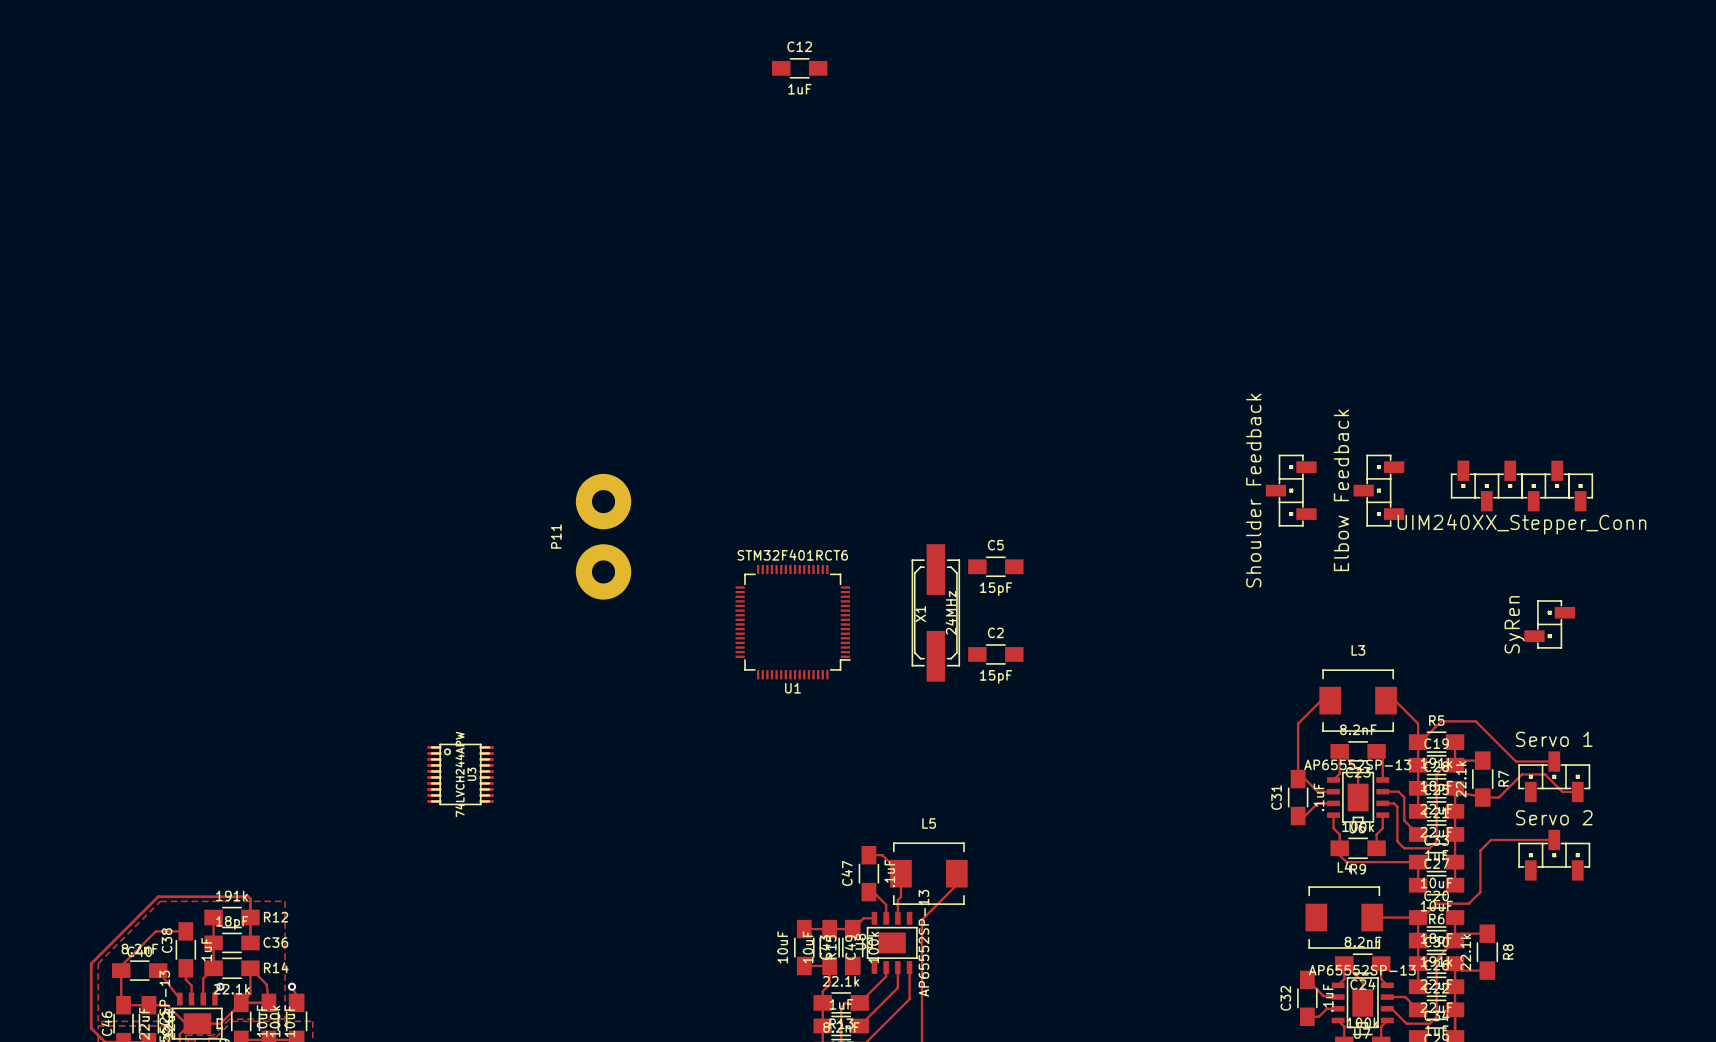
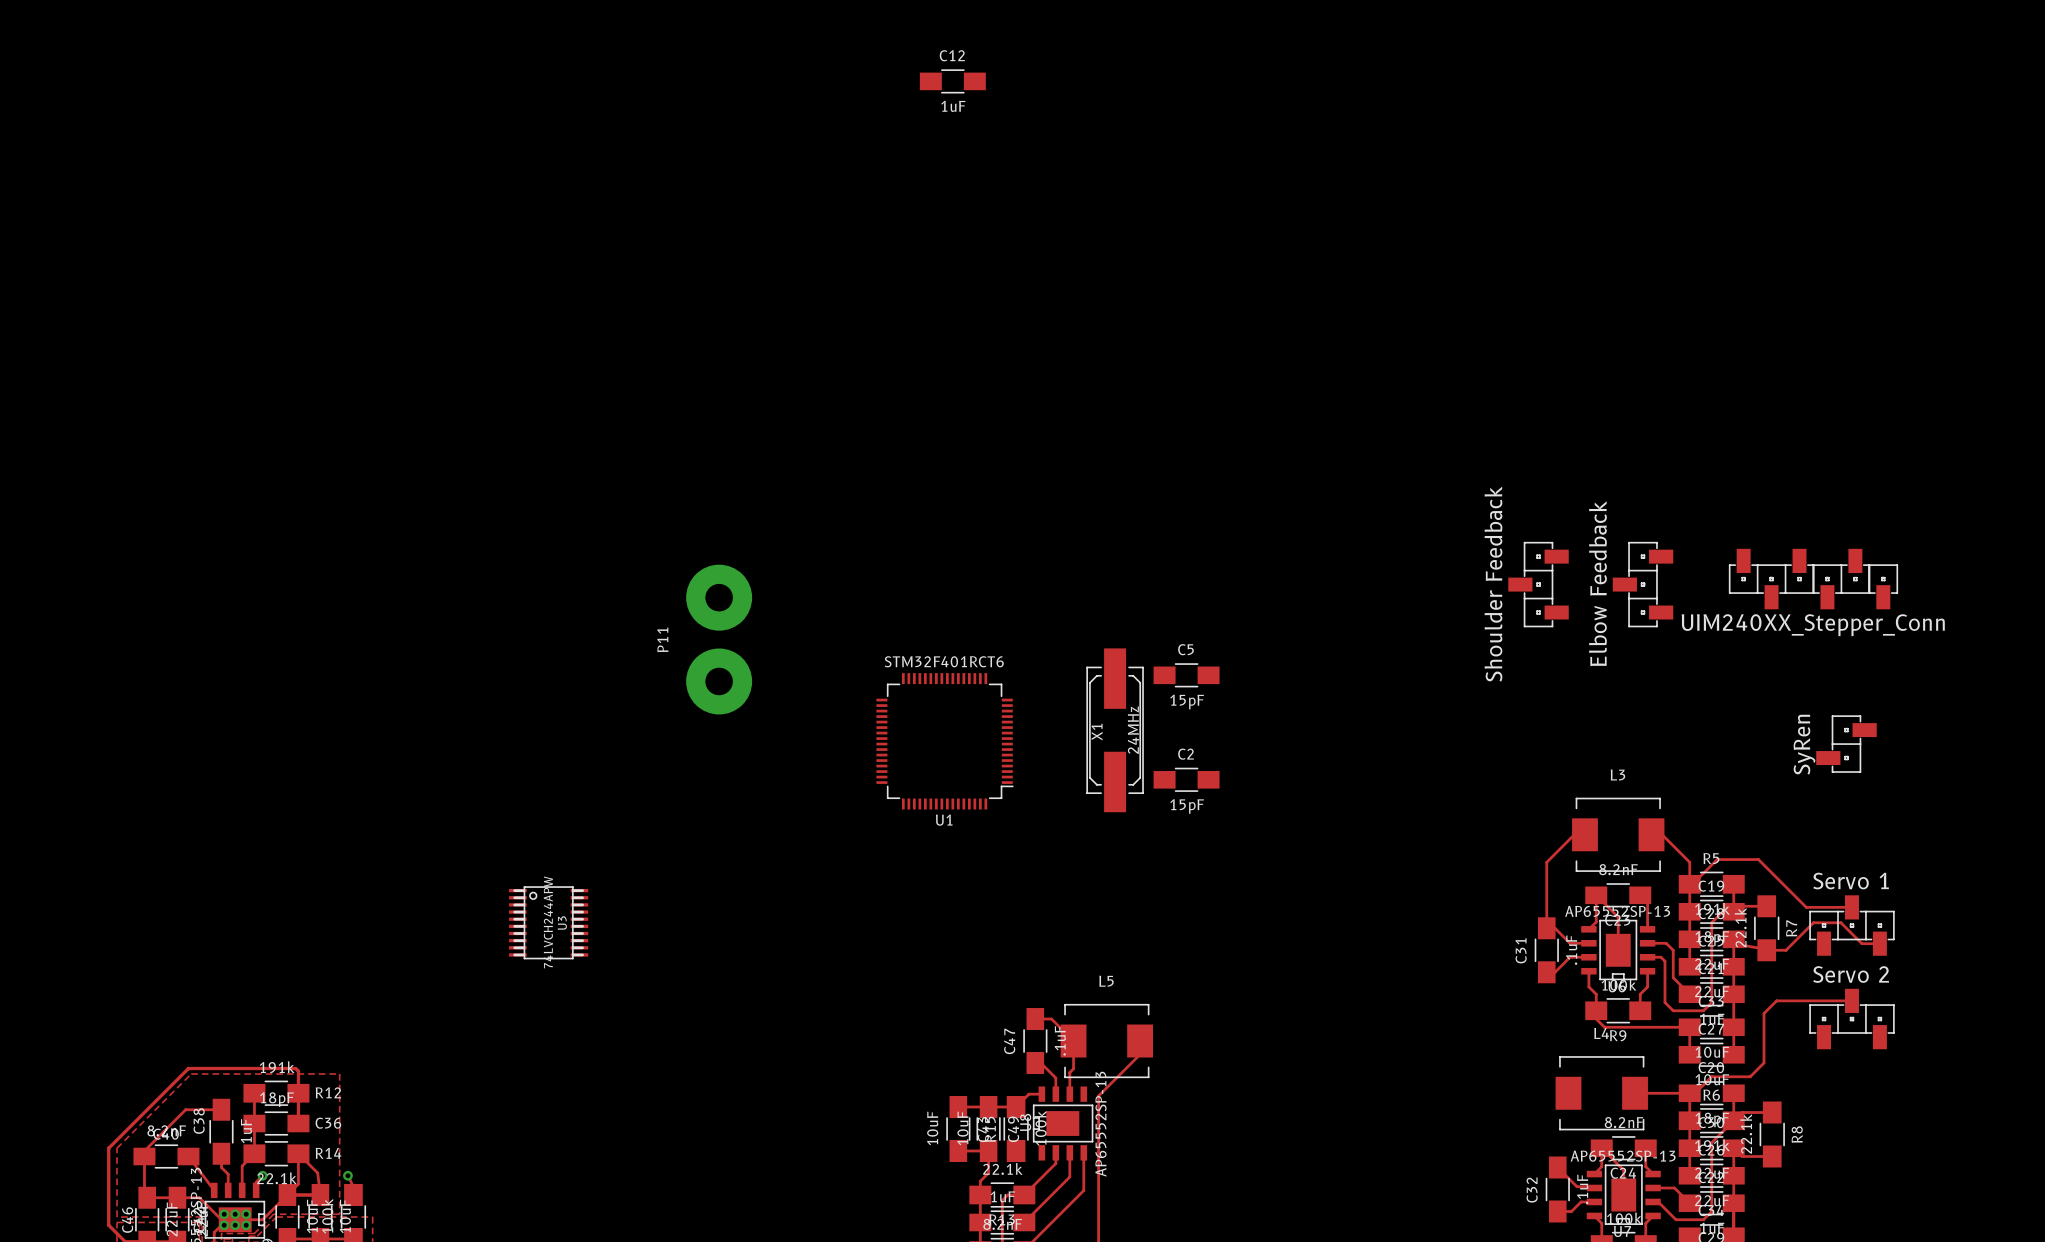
via: none -> (224, 1214)
via: none -> (235, 1214)
via: none -> (246, 1214)
via: none -> (224, 1225)
via: none -> (235, 1225)
via: none -> (246, 1225)

